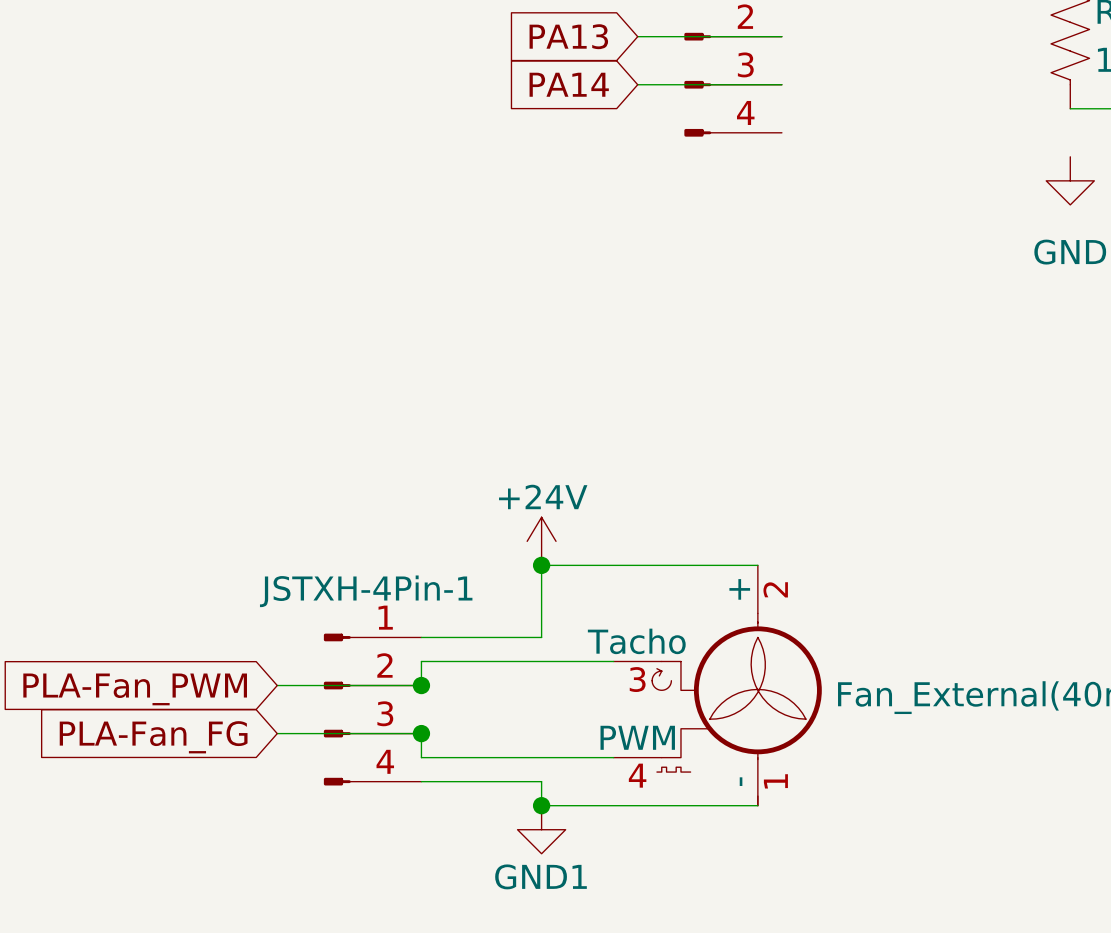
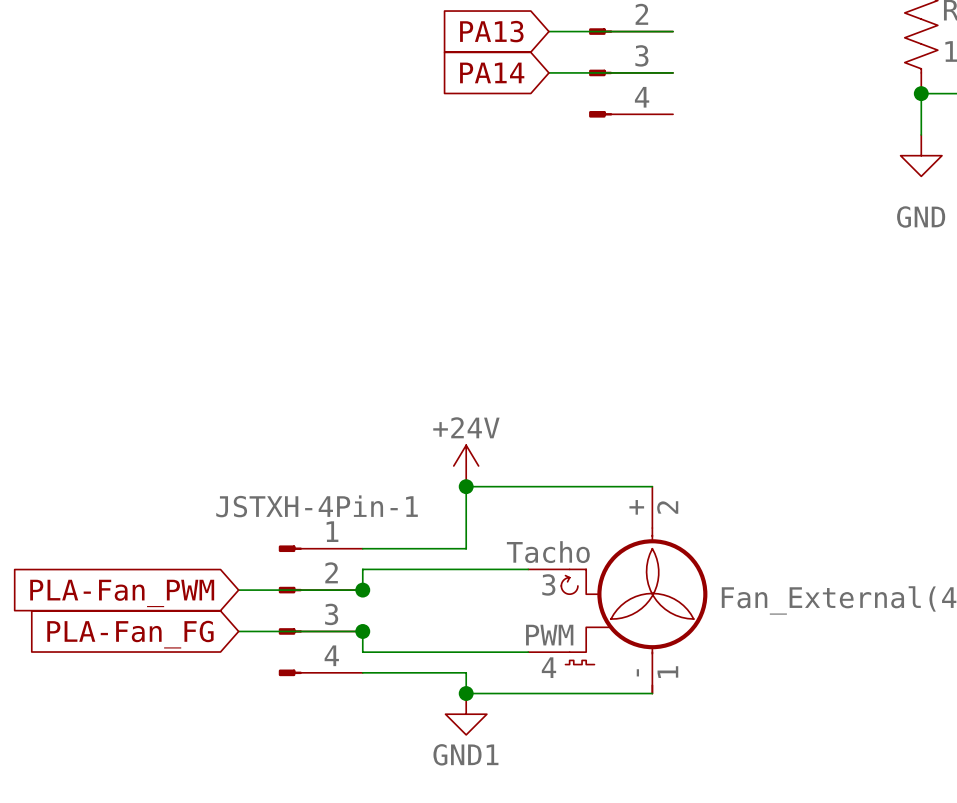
wire: none -> (921, 93) (921, 135)
junction: none -> (921, 93)

